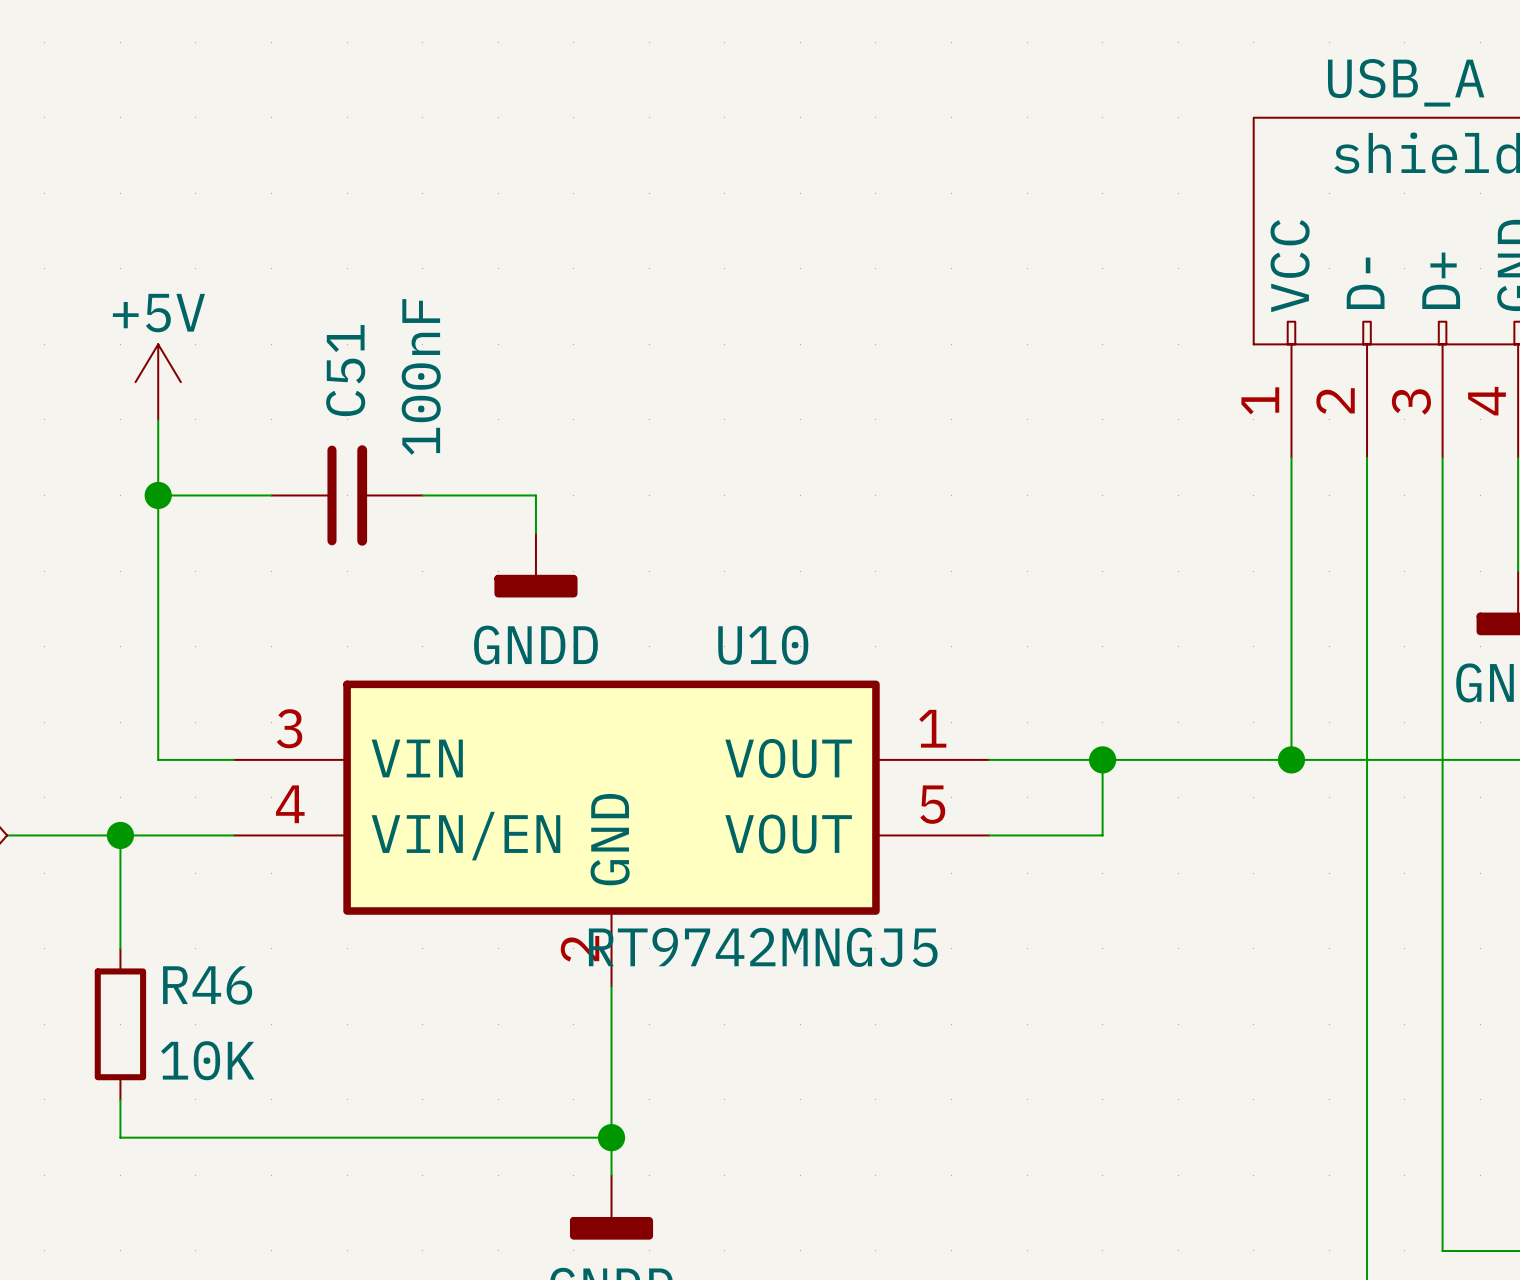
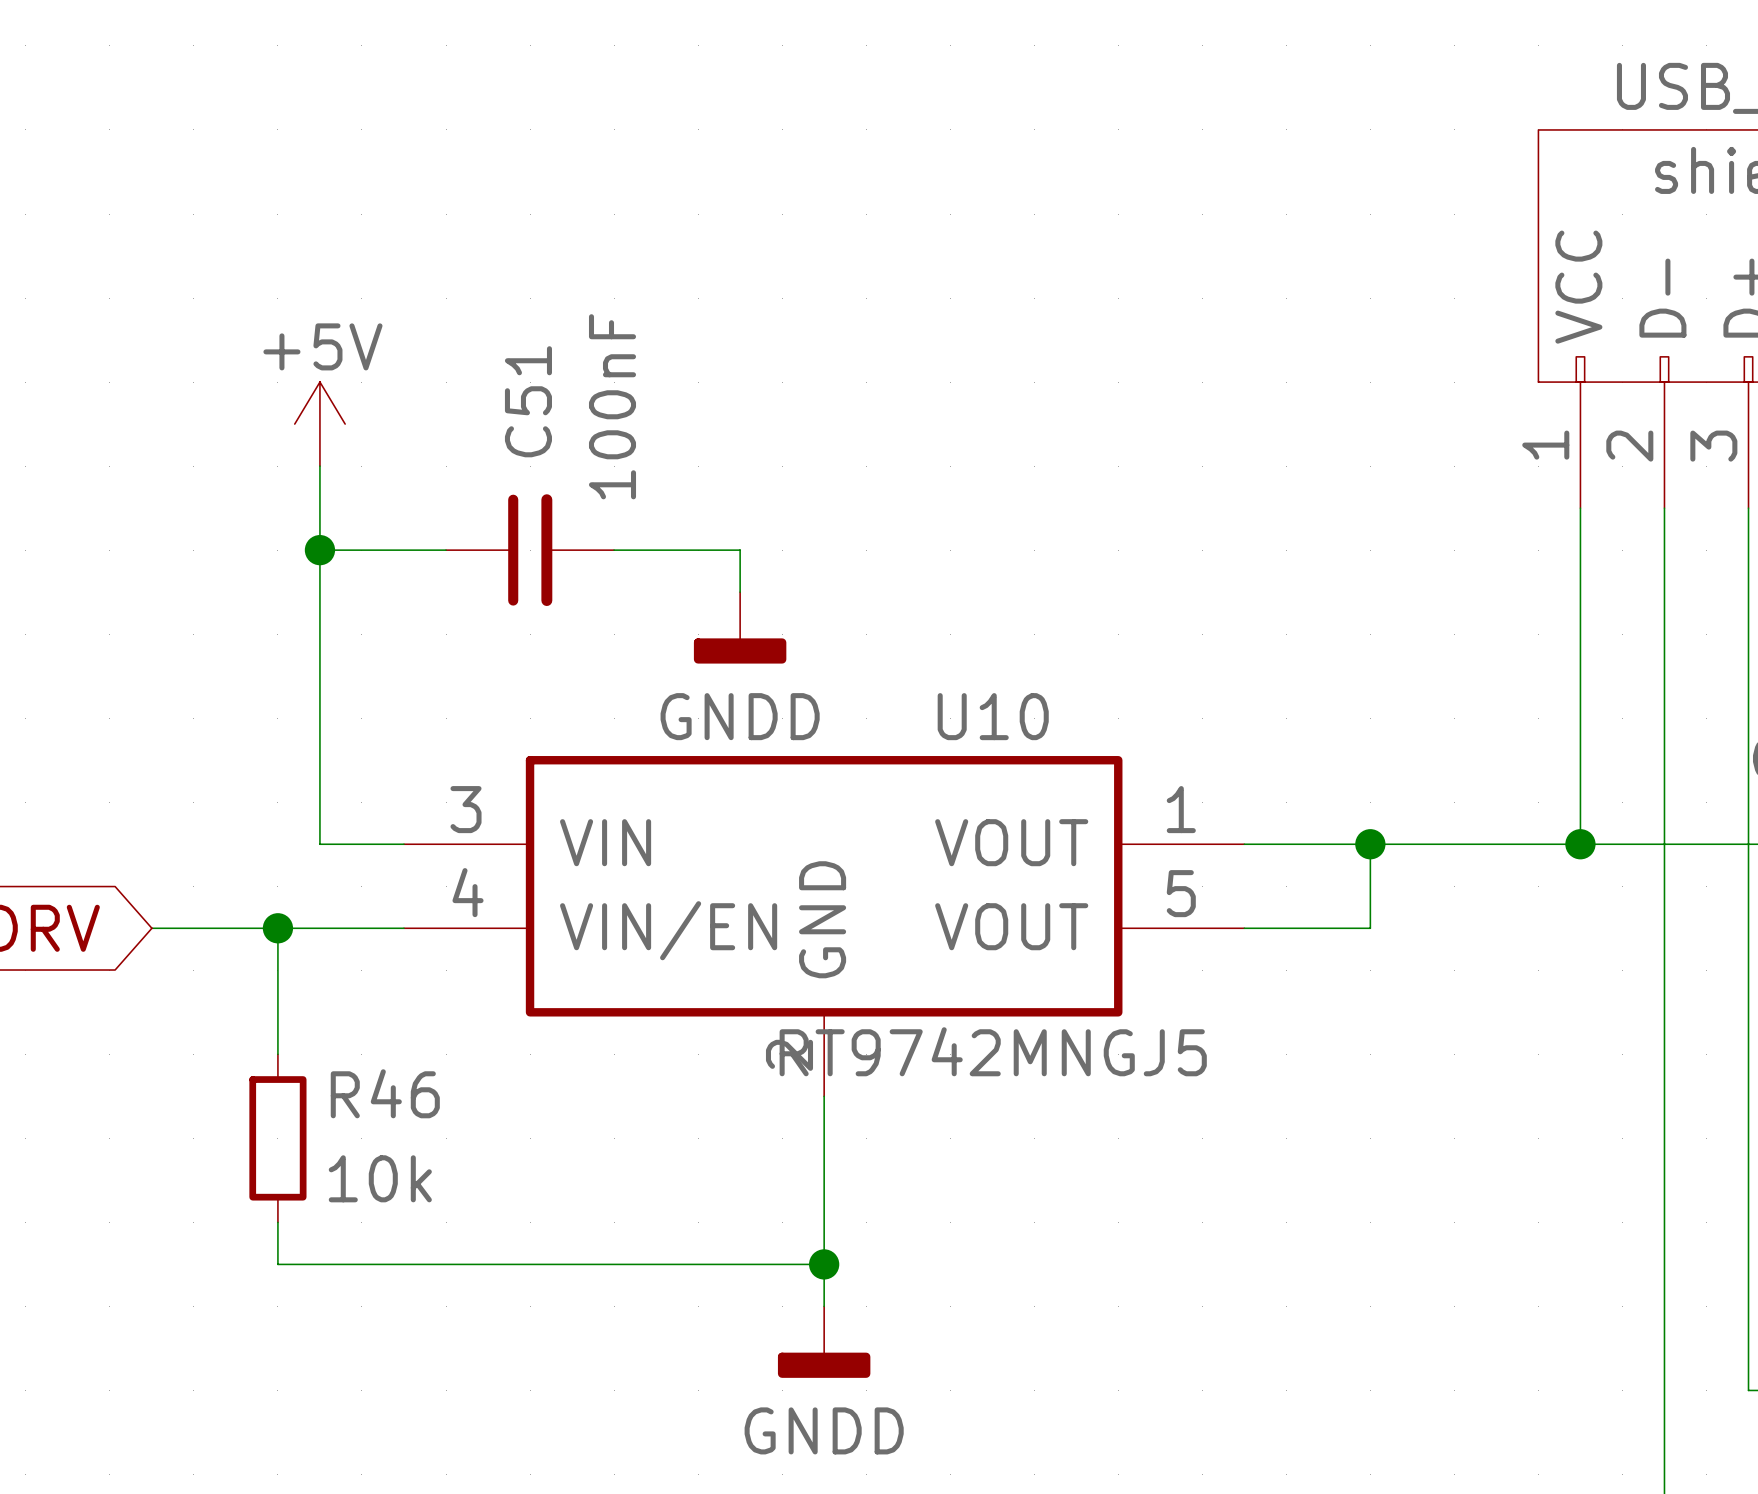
R46 value: 10K (207, 1060) -> 10k (380, 1178)

